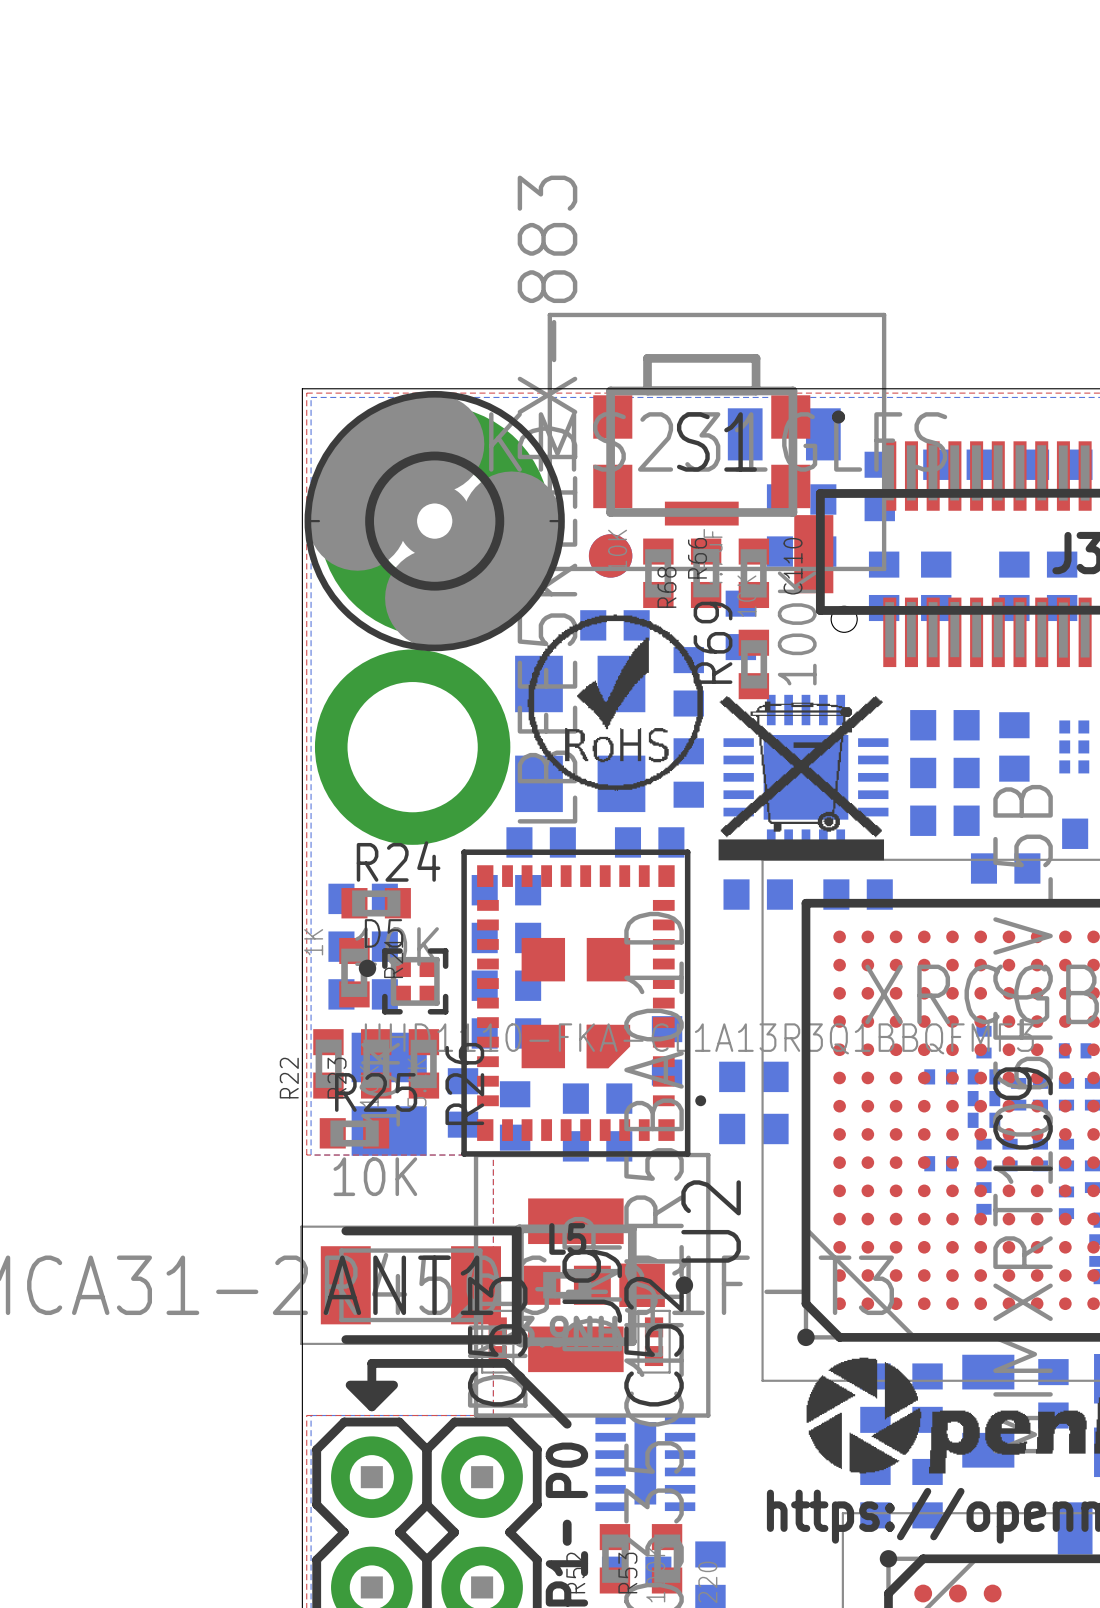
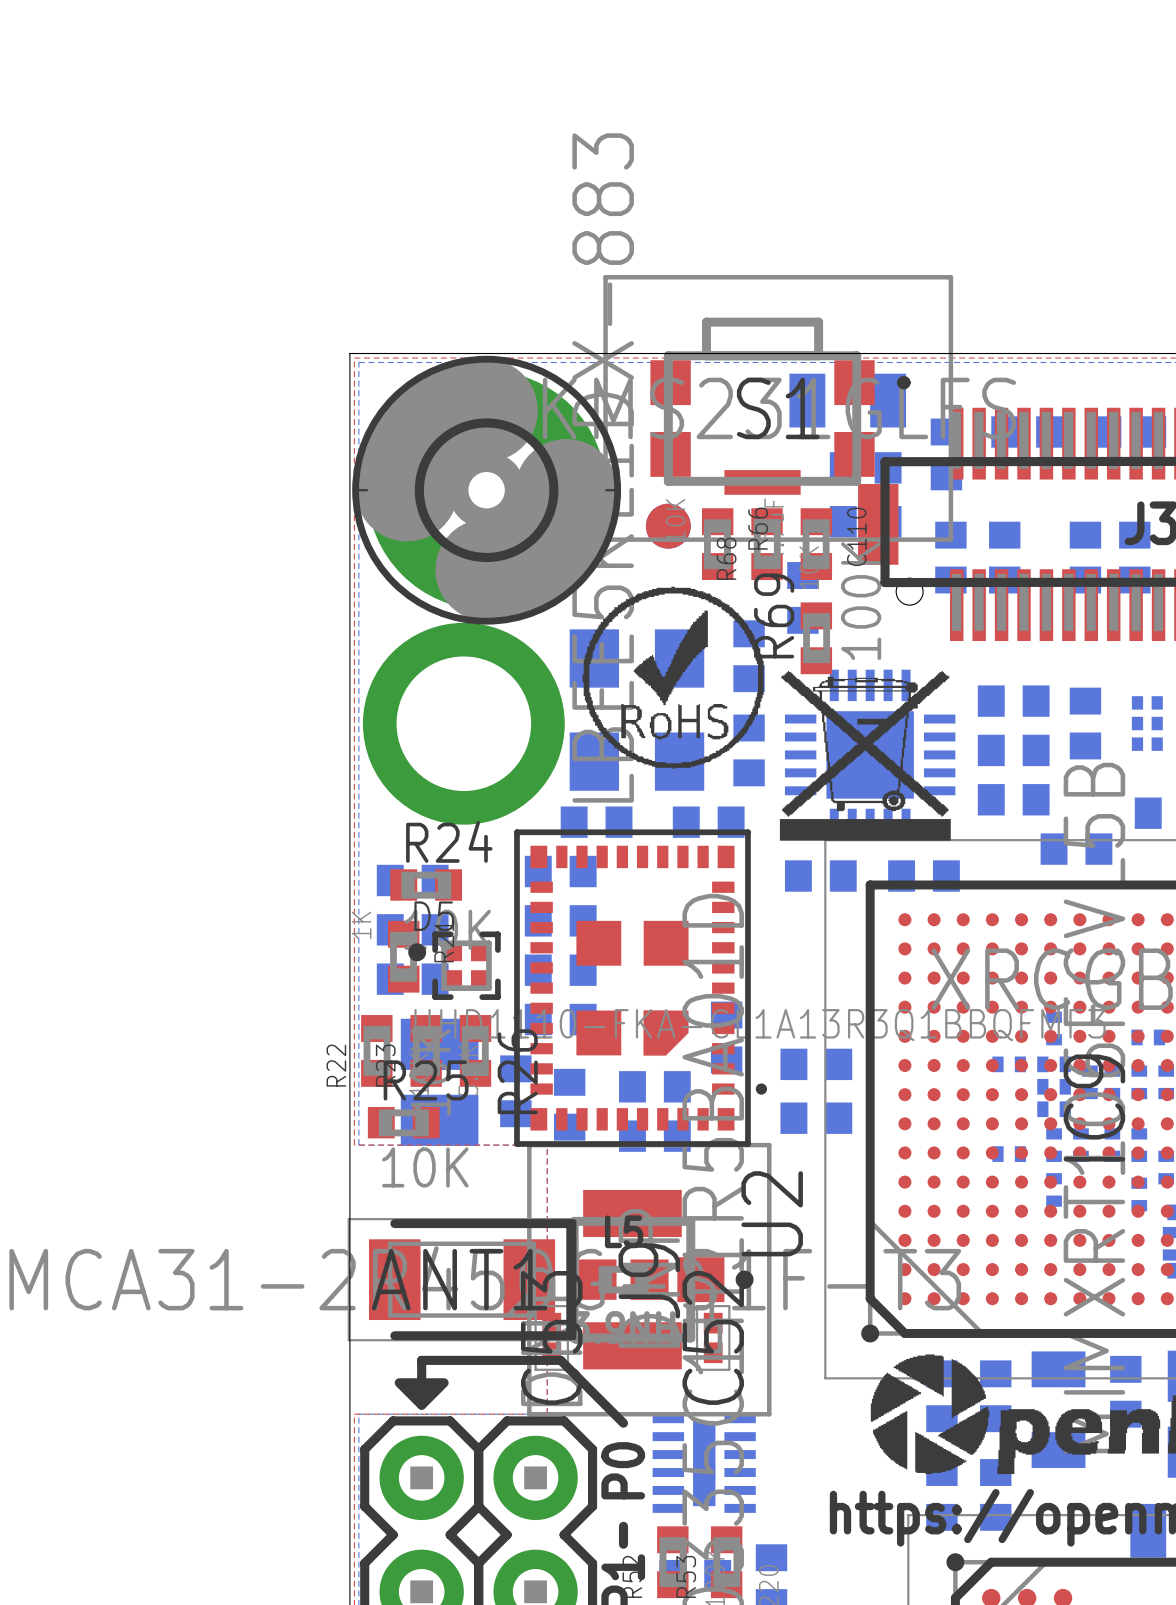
part: (614, 625) -> none

